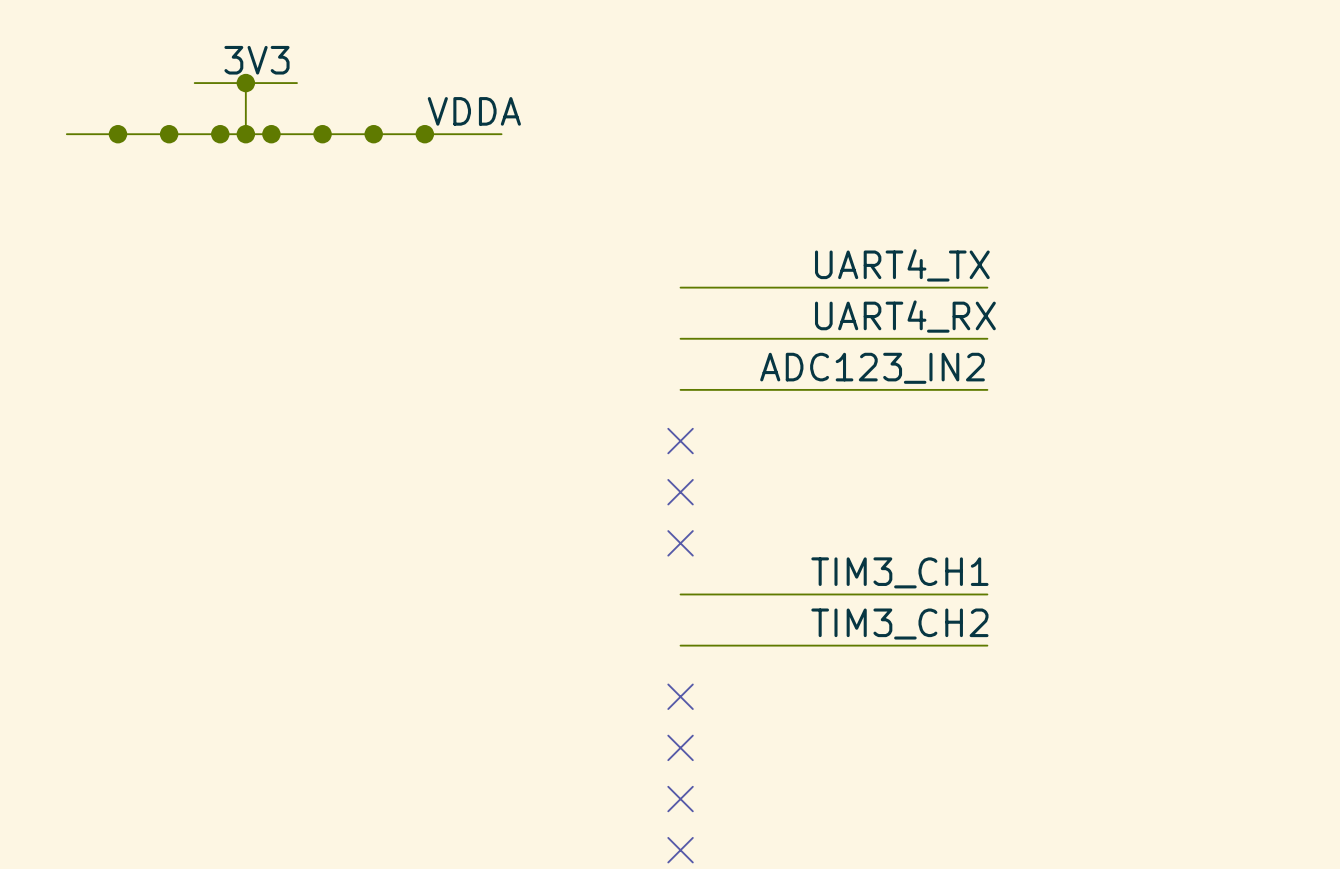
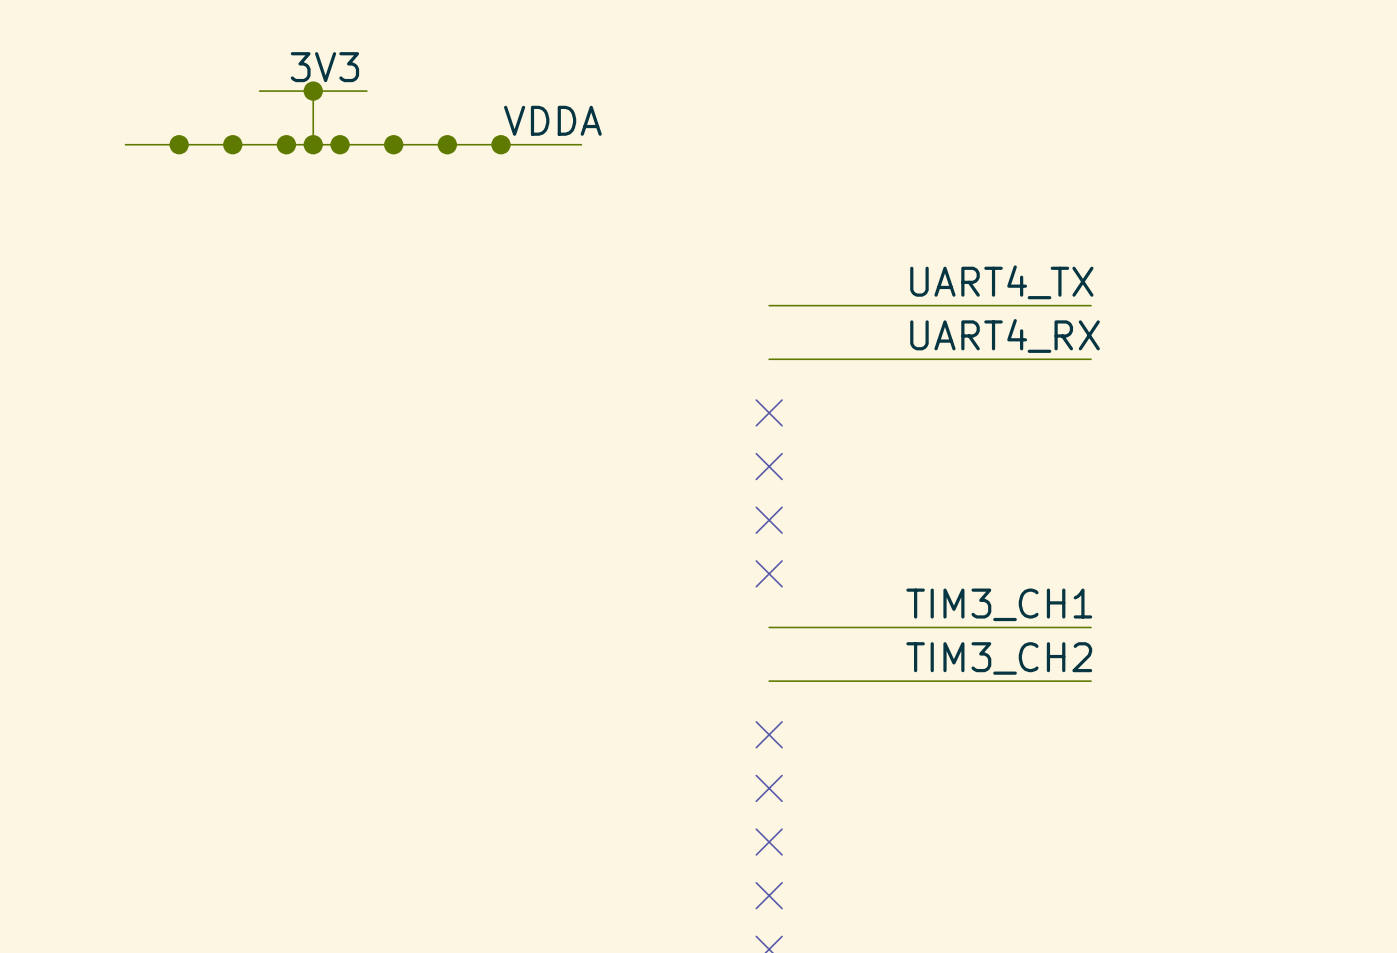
label: ADC123_IN2 (872, 368) -> none
wire: (680, 389) (987, 389) -> none
no-connect mark: none -> (769, 412)

